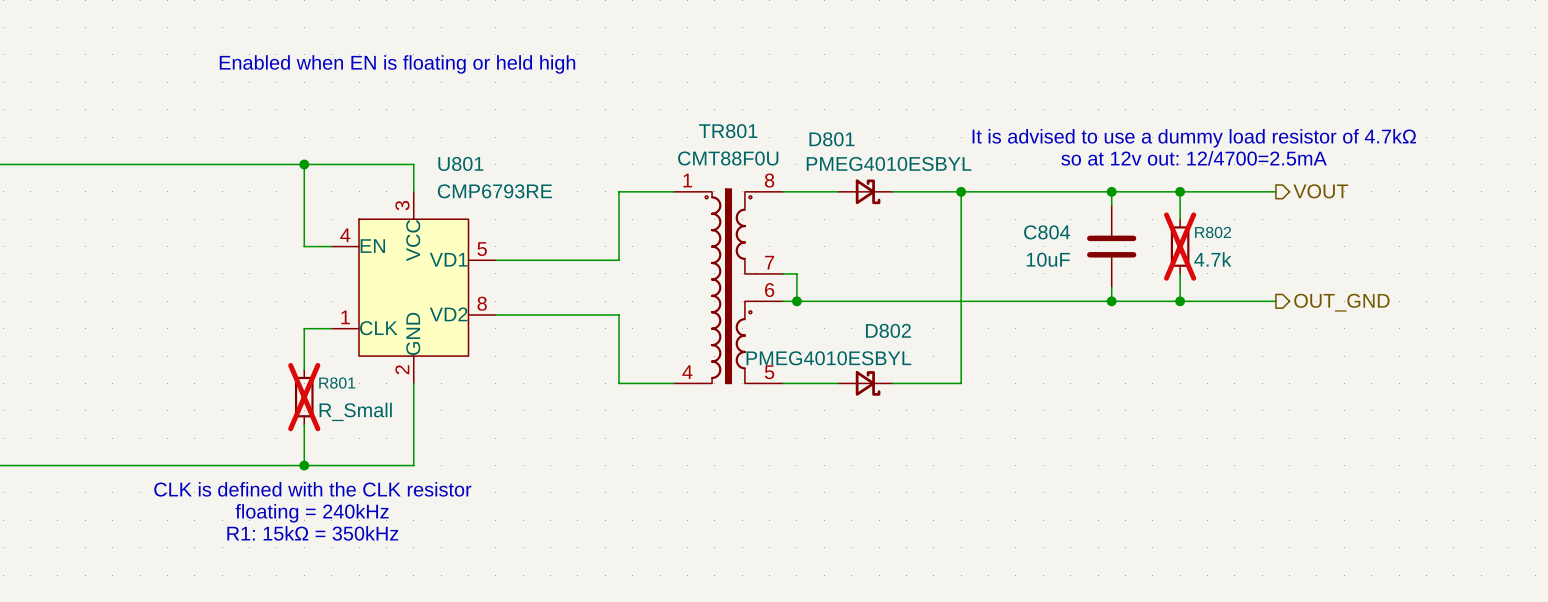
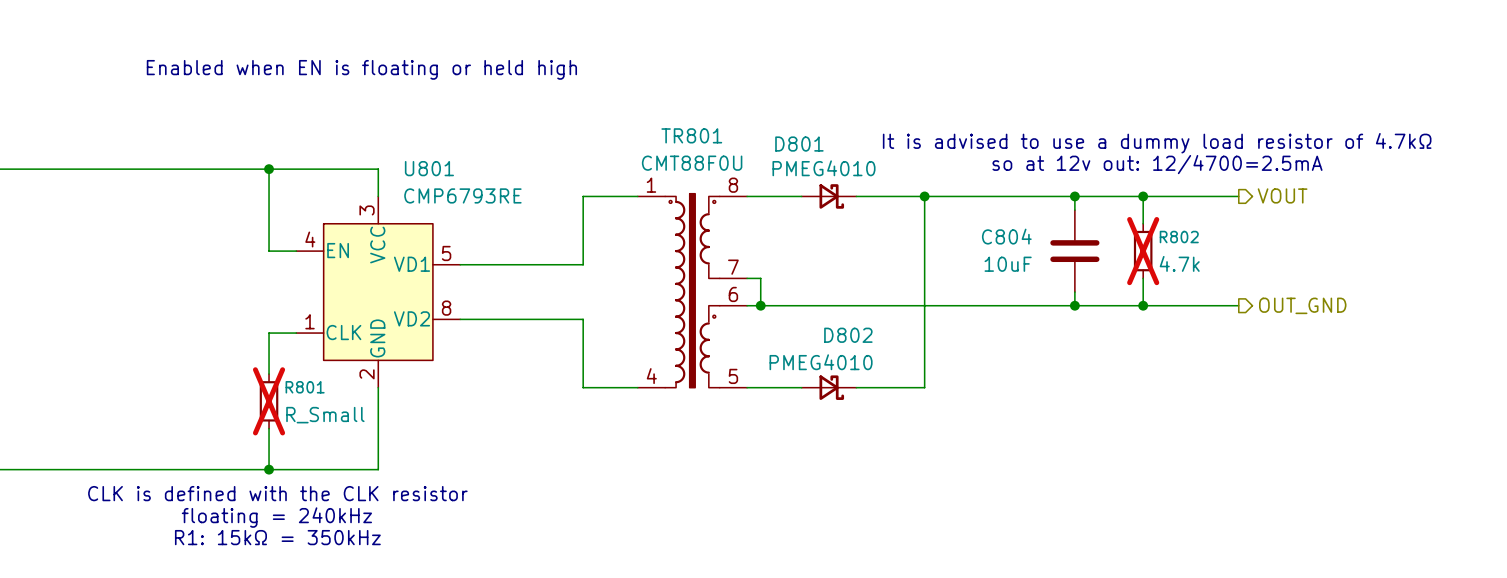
D801 value: PMEG4010ESBYL (889, 163) -> PMEG4010 (823, 168)
D802 value: PMEG4010ESBYL (828, 358) -> PMEG4010 (821, 362)

